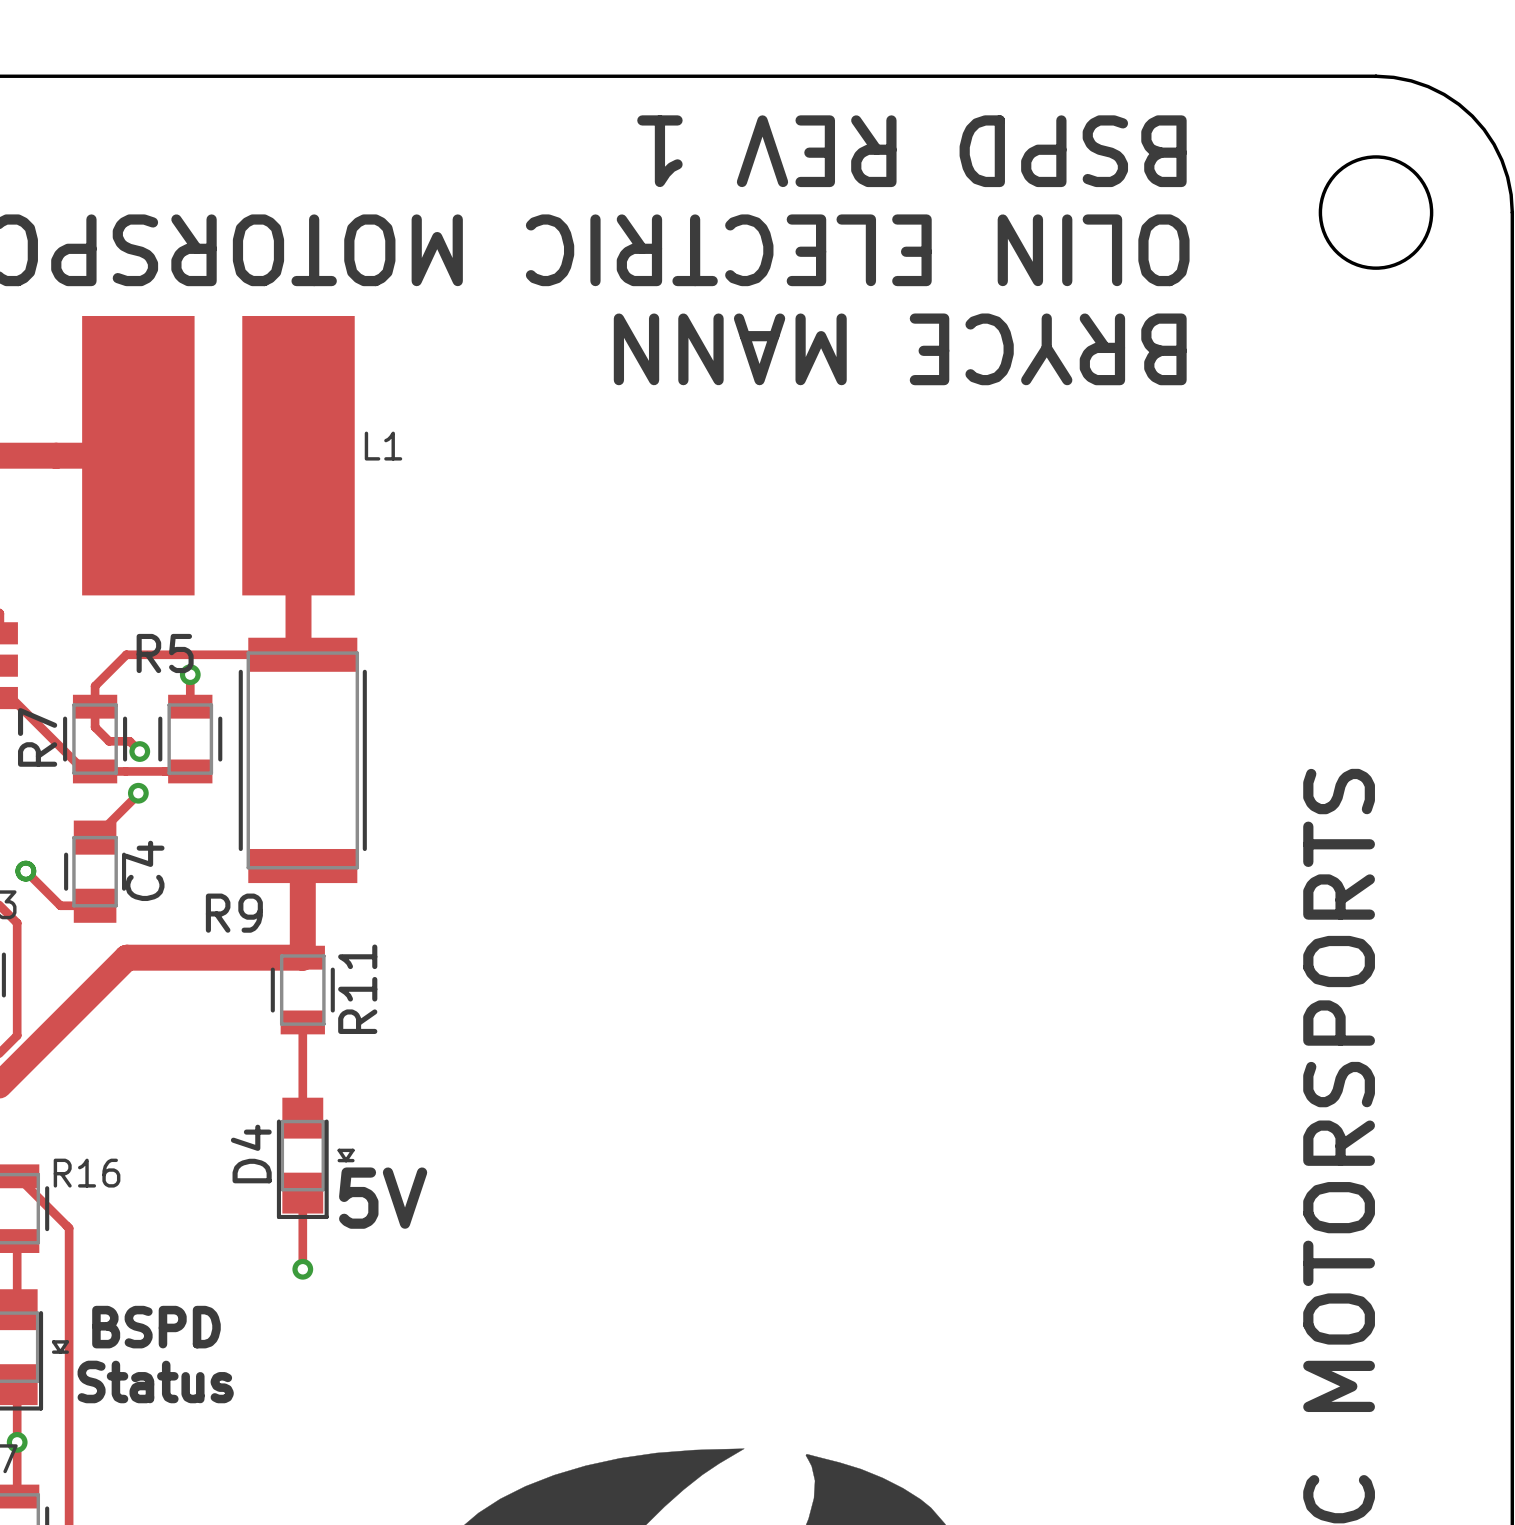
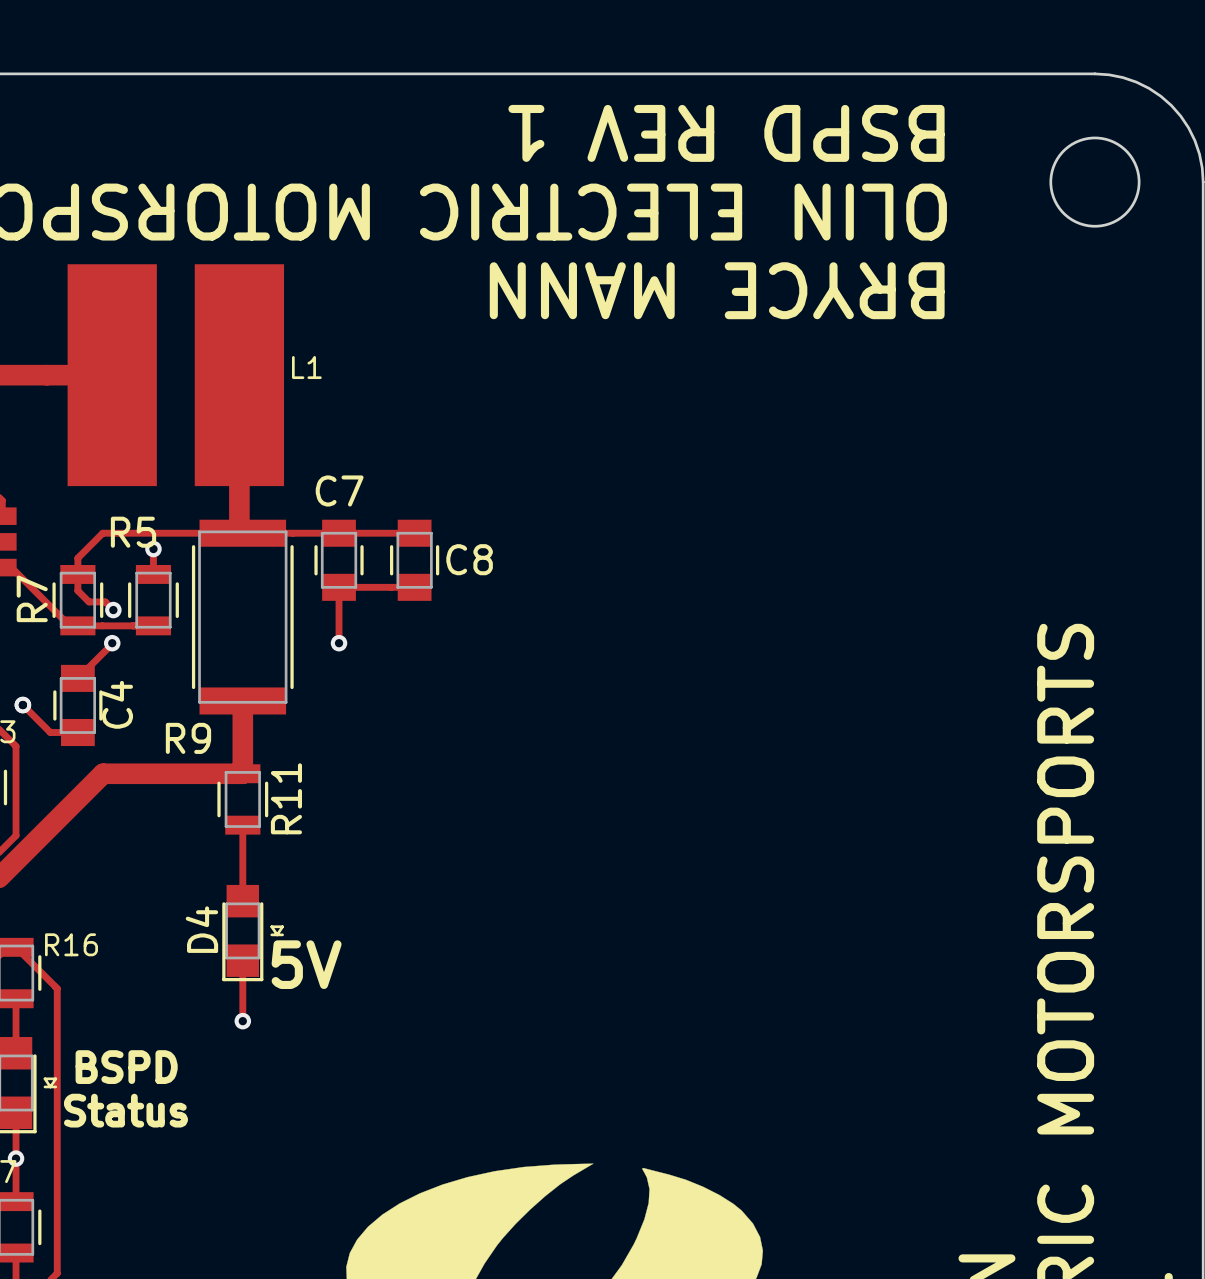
track: none -> (242, 533) (414, 533)
C7: none -> (339, 560)
C8: none -> (414, 560)
track: none -> (414, 587) (339, 587) (339, 643)
via: none -> (339, 643)

